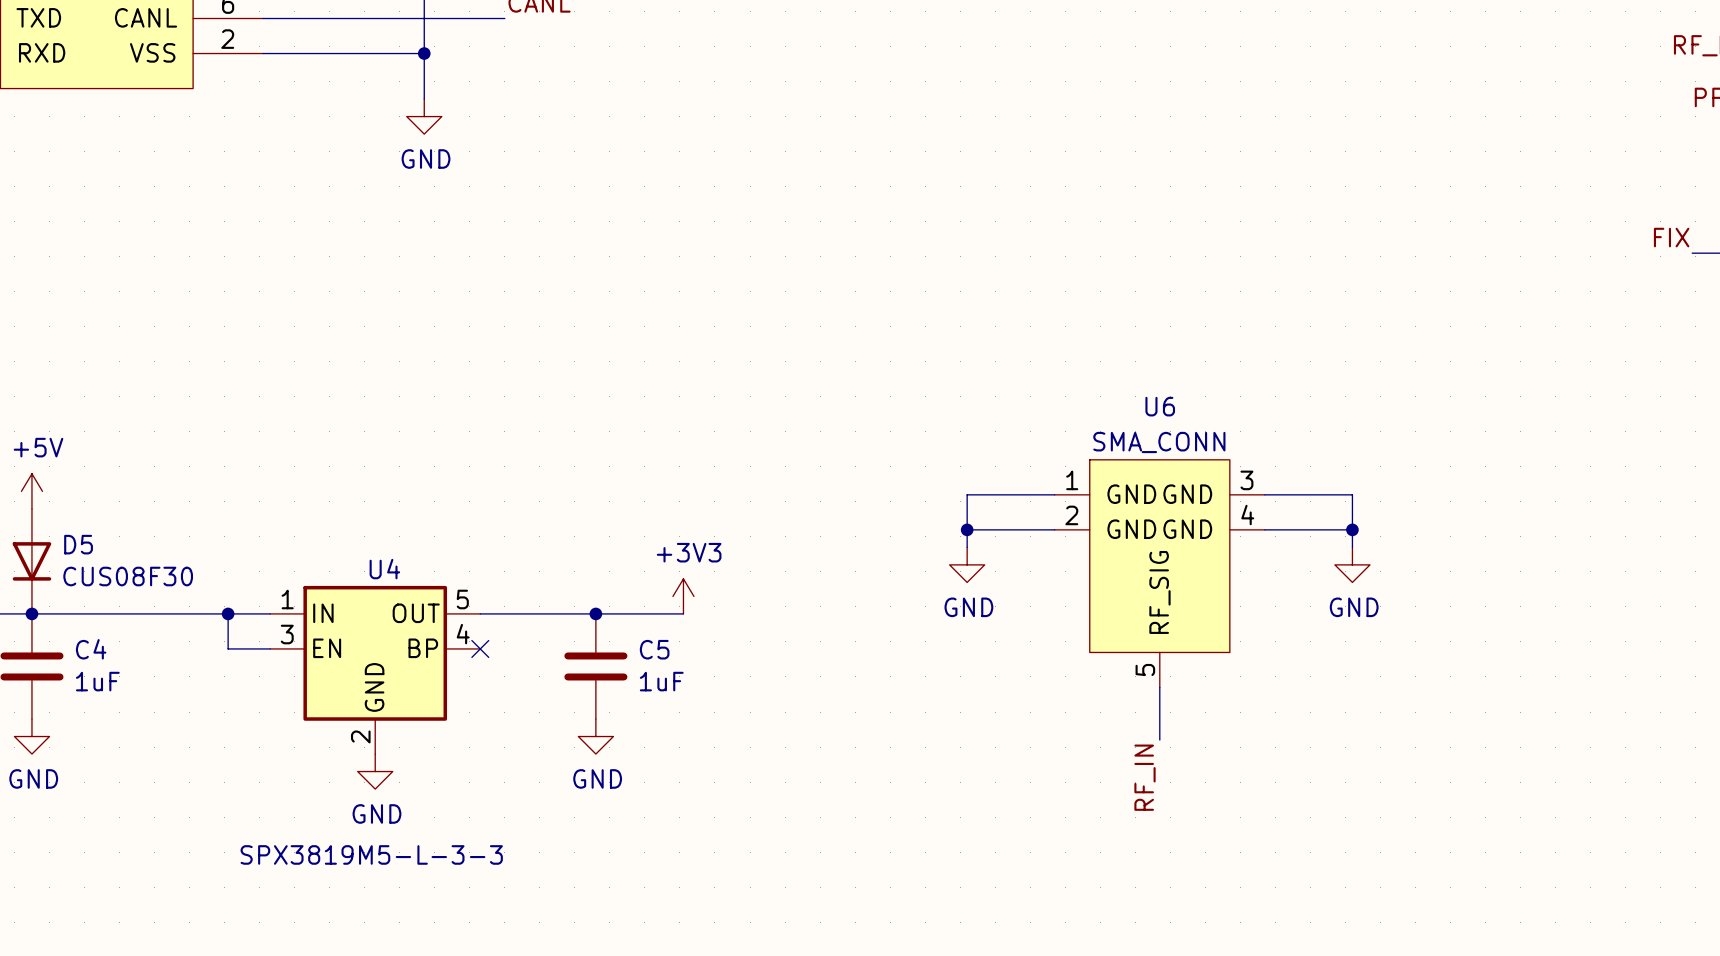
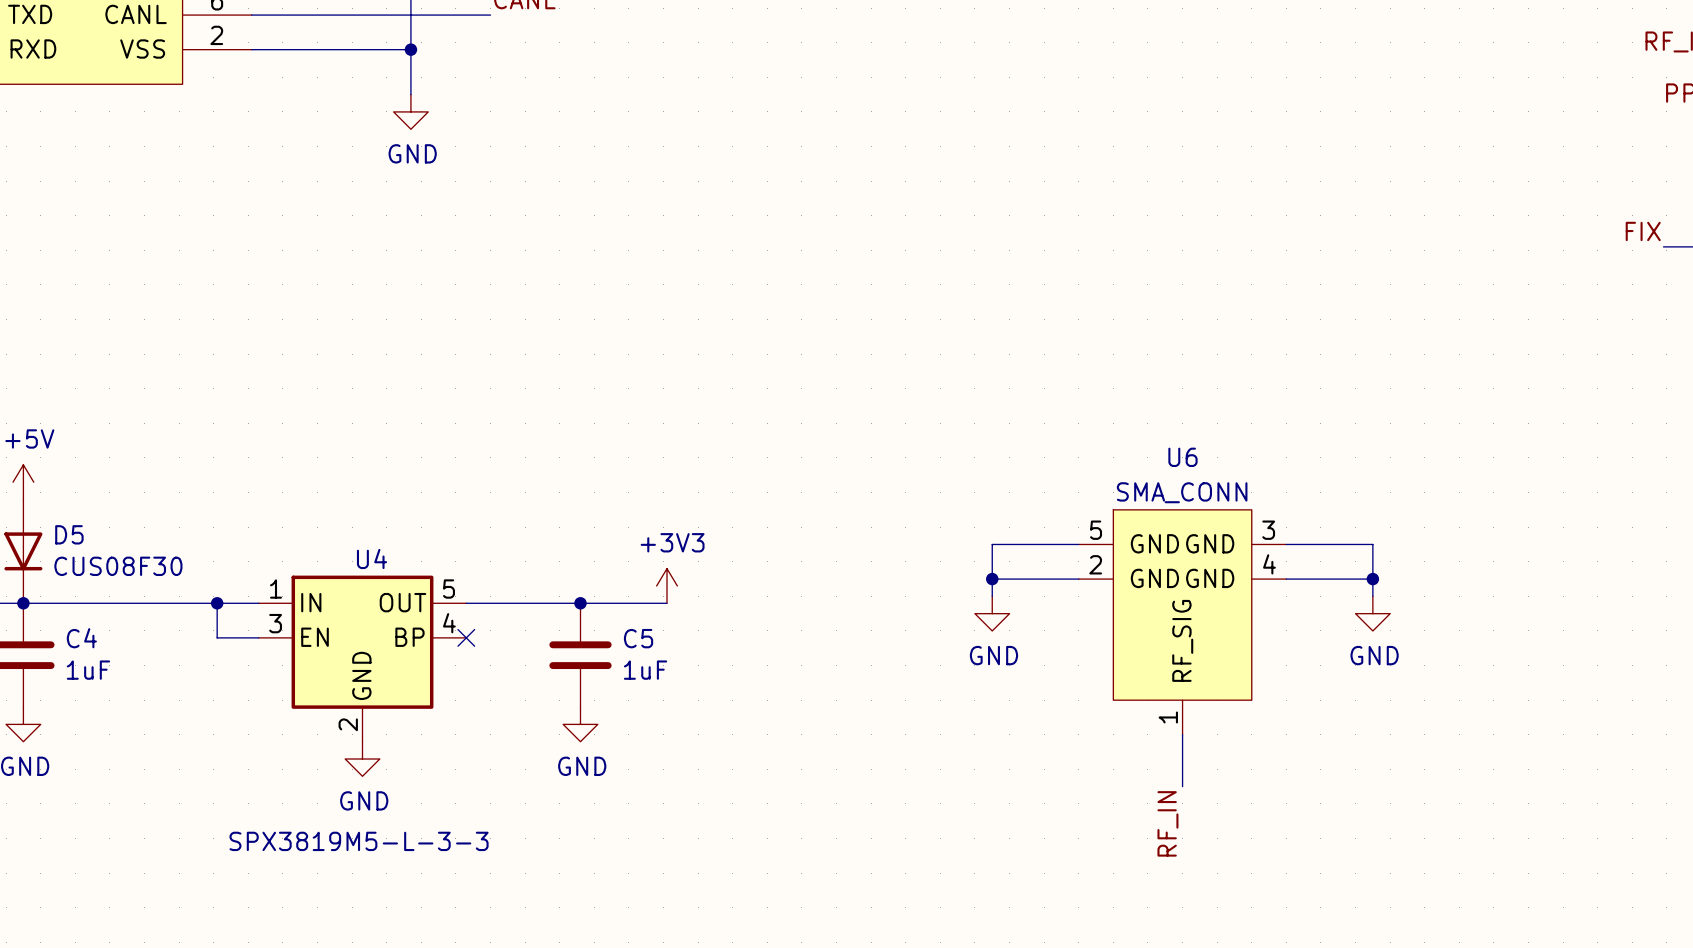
U6 pin number: 1 (1072, 480) -> 5 (1096, 530)
wire: (1054, 494) (967, 494) (967, 547) -> (1078, 544) (992, 544) (992, 596)
wire: (1264, 494) (1352, 494) (1352, 547) -> (1286, 544) (1372, 544) (1372, 596)
wire: (967, 529) (1054, 529) -> (992, 579) (1078, 579)
junction position: (967, 529) -> (992, 579)
wire: (1264, 529) (1352, 529) -> (1286, 579) (1372, 579)
junction position: (1352, 529) -> (1372, 579)
power symbol position: GND (967, 564) -> GND (992, 613)
power symbol position: GND (1352, 564) -> GND (1372, 613)
U6 position: (1159, 573) -> (1182, 622)
U6 pin number: 5 (1145, 669) -> 1 (1168, 717)
wire: (1159, 687) (1159, 740) -> (1182, 734) (1182, 786)
label position: RF_IN (1145, 777) -> RF_IN (1167, 823)

